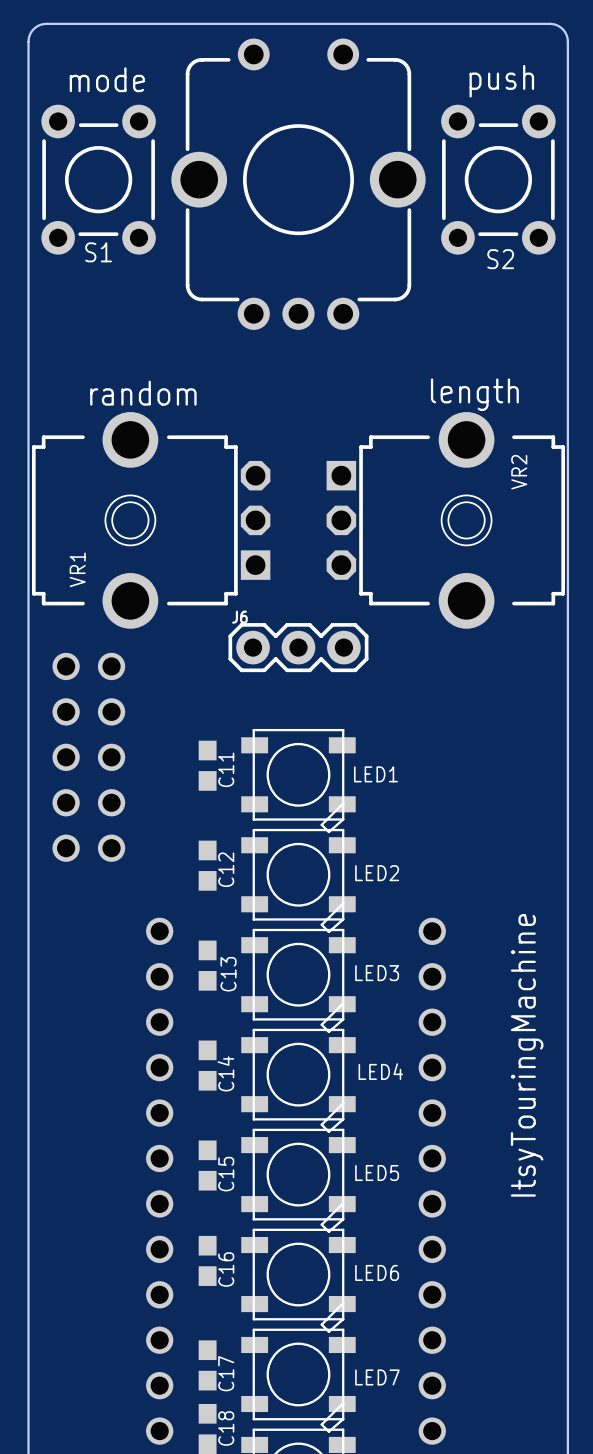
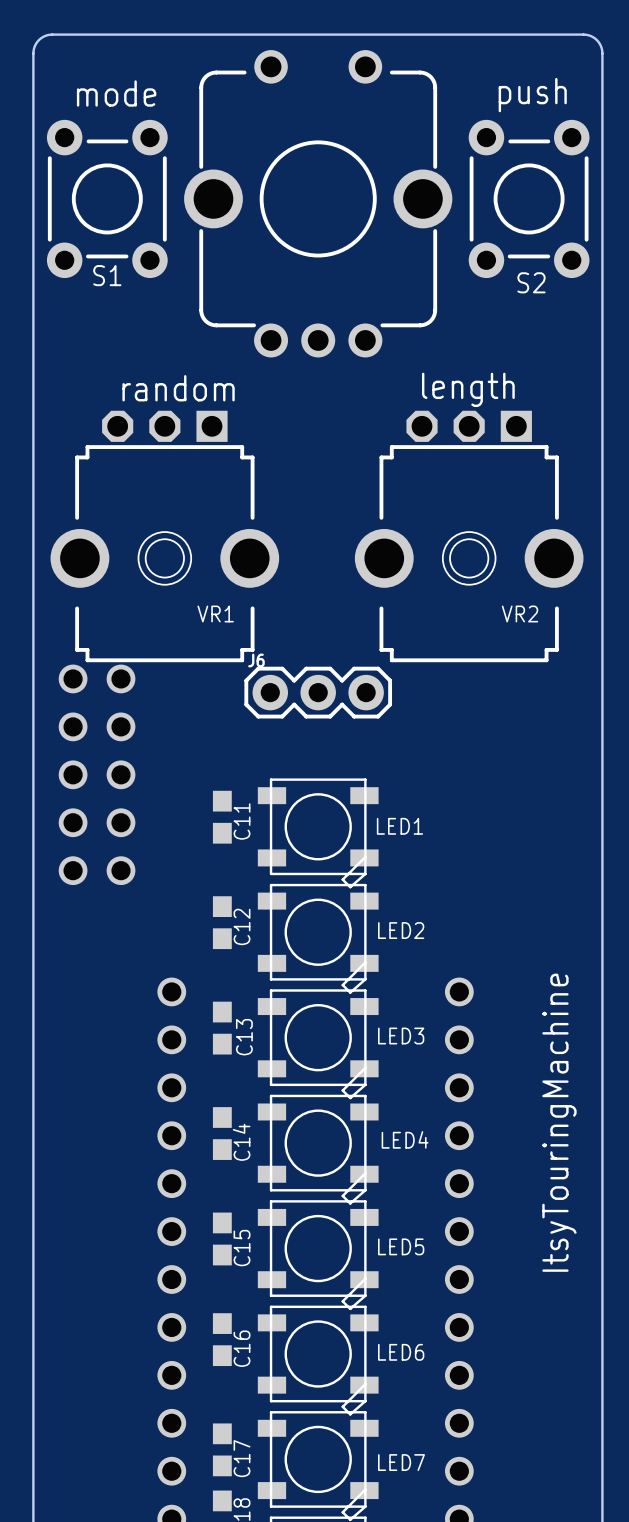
text position: random (143, 393) -> random (178, 388)
text position: length (474, 394) -> length (468, 389)
VR1 rotation: 0° (151, 520) -> 90° counterclockwise (164, 536)
VR2 rotation: 0° (445, 520) -> 90° clockwise (469, 536)
part position: (88, 757) -> (97, 774)

